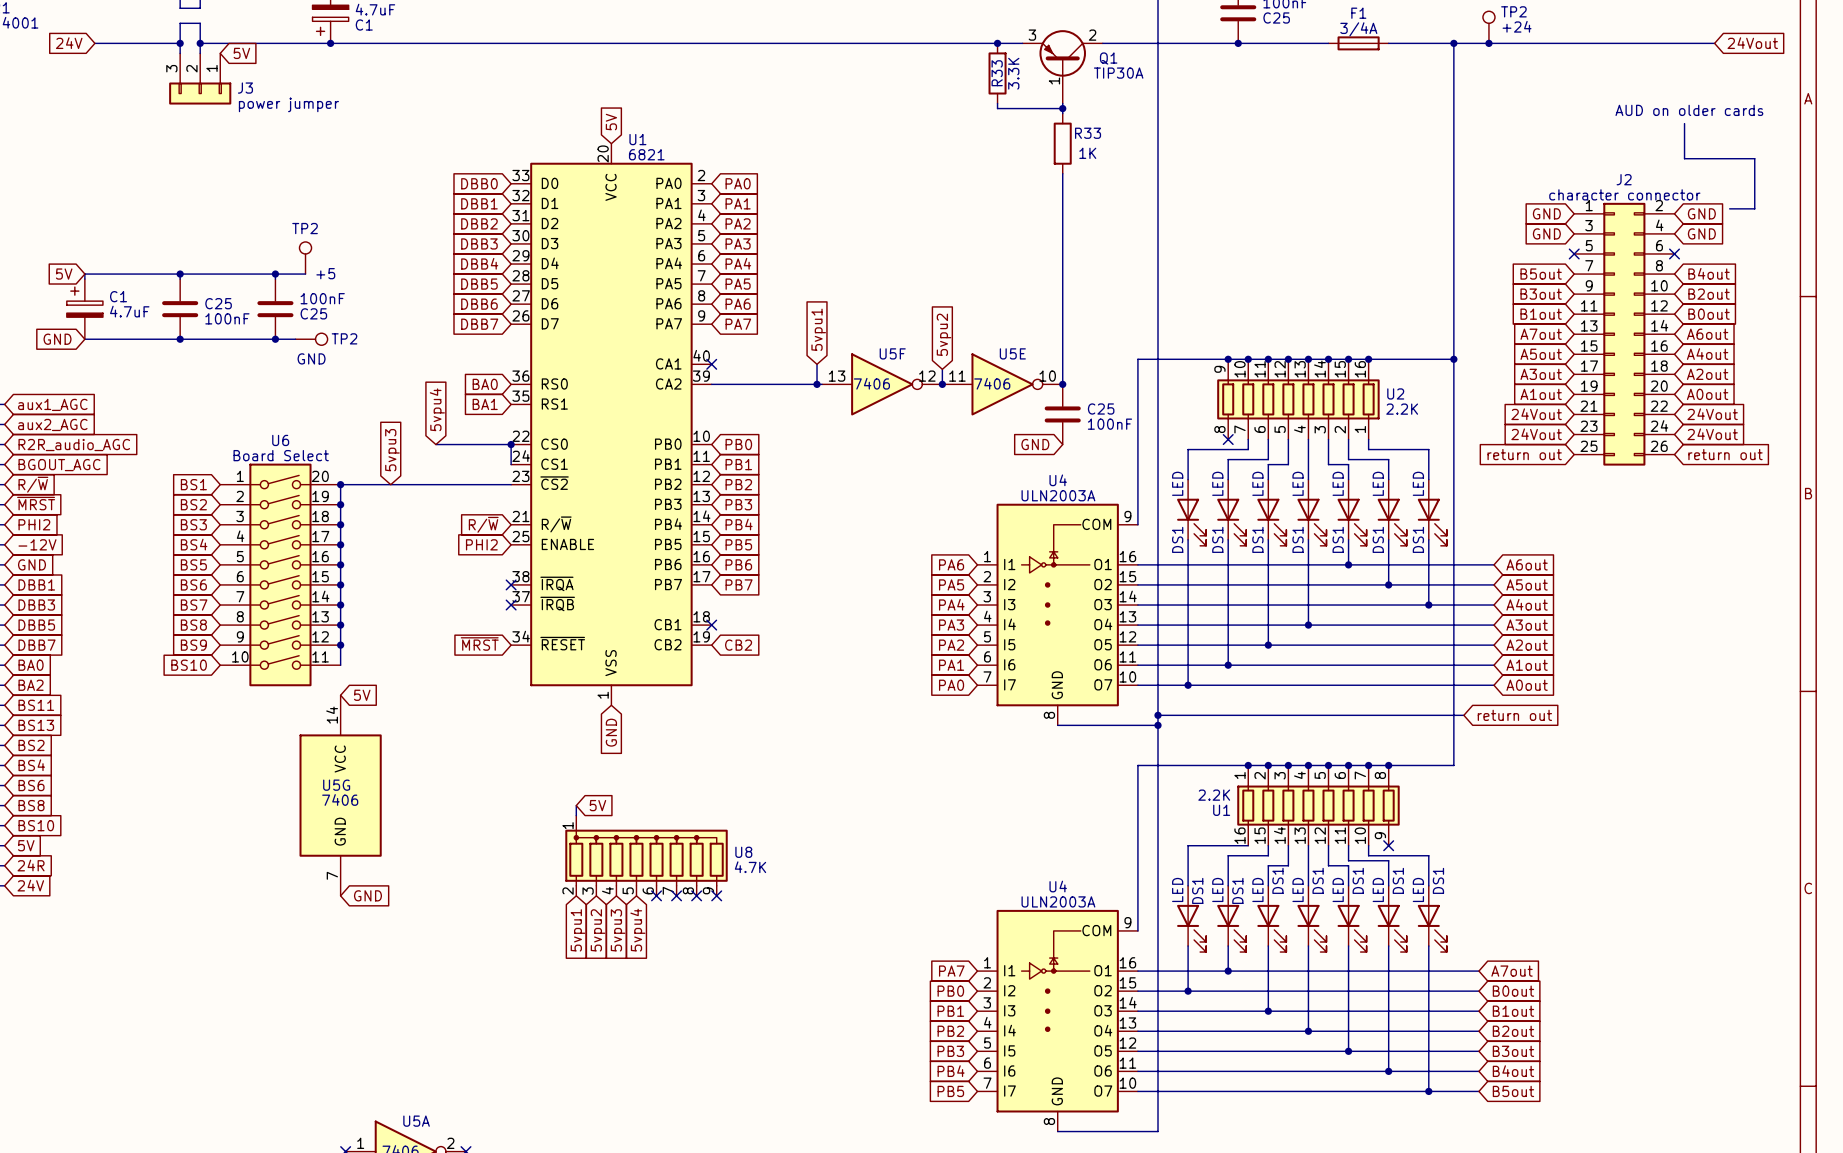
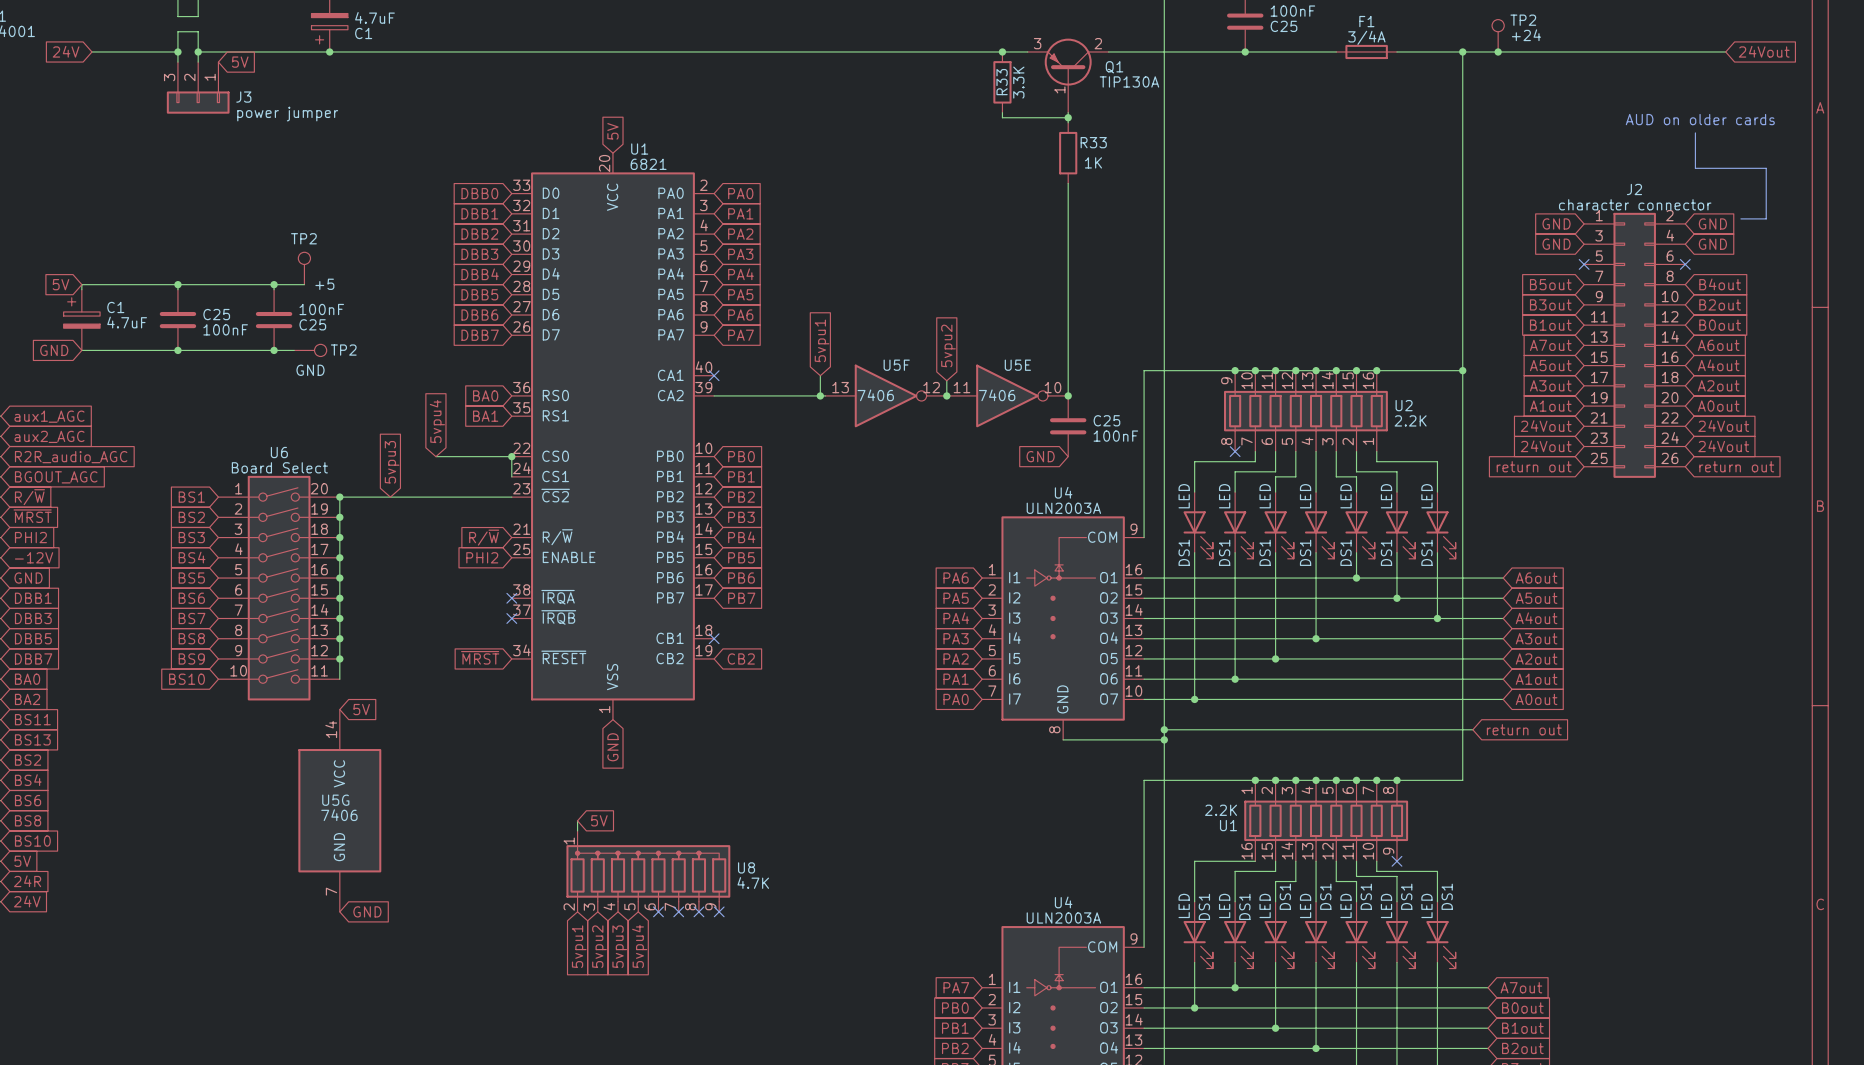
Q1 value: TIP30A (1118, 73) -> TIP130A (1129, 81)

